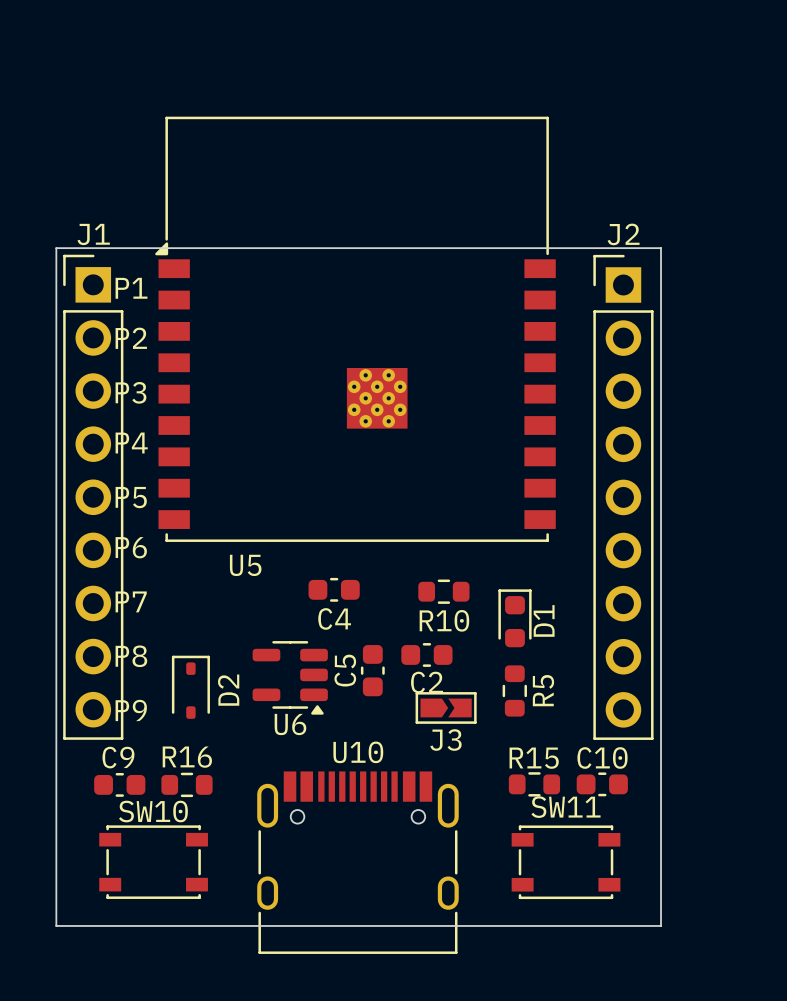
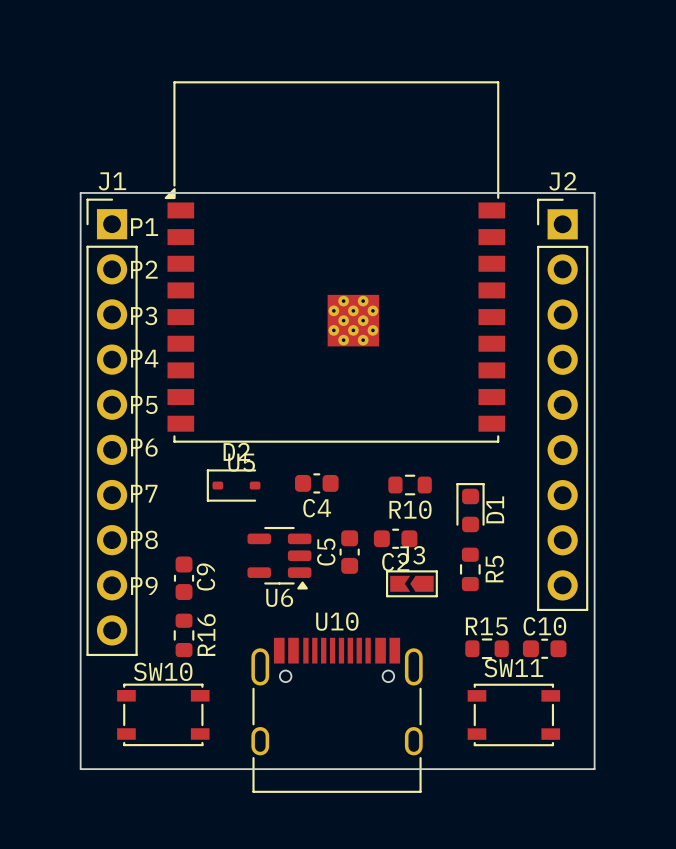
J1 footprint: [63, 254, 124, 740] -> [86, 198, 138, 657]
D2 rotation: 0° (190, 687) -> 90° counterclockwise (233, 485)
D2 position: (190, 687) -> (233, 485)
J3 rotation: 0° (446, 707) -> 180° (411, 583)
C9 rotation: 0° (119, 784) -> 90° clockwise (184, 578)
C9 position: (119, 784) -> (184, 578)
R16 rotation: 0° (186, 784) -> 90° clockwise (184, 635)

